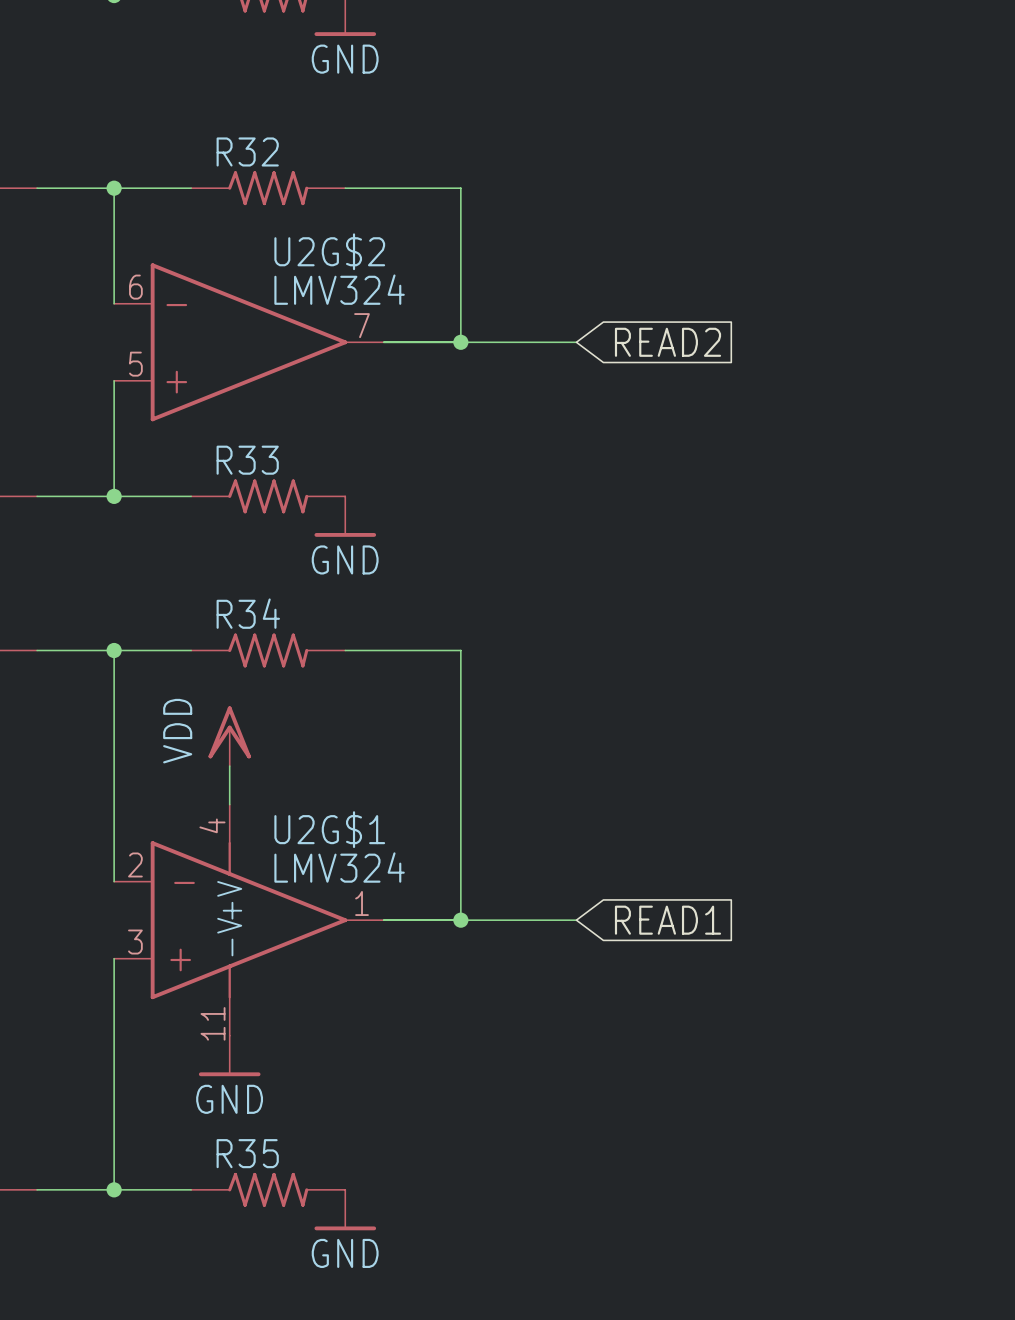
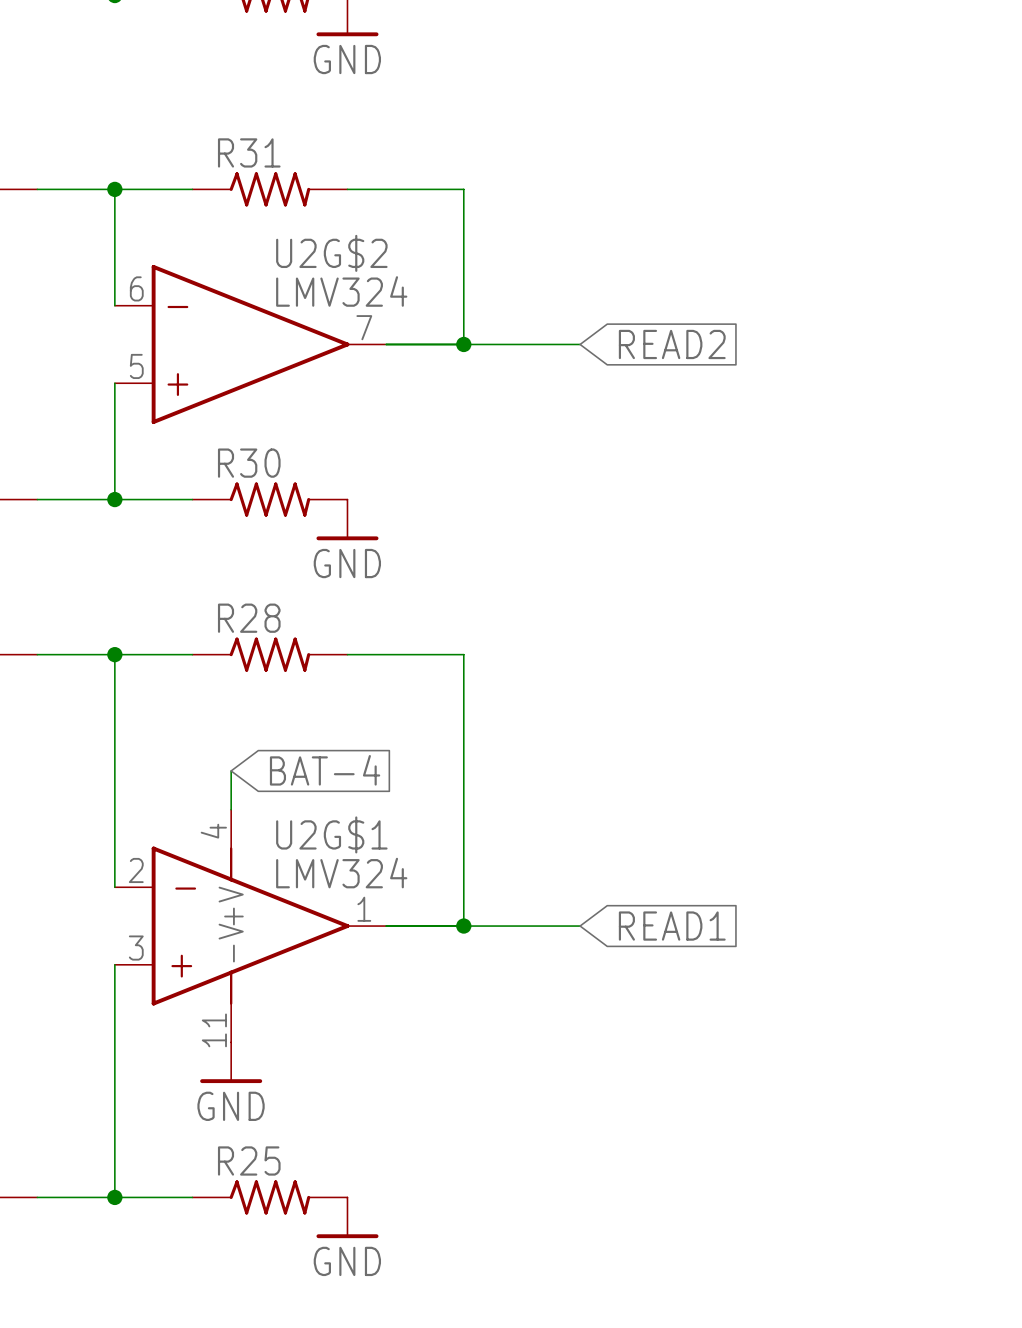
R32 name: R32 (247, 151) -> R31 (249, 152)
R33 name: R33 (247, 460) -> R30 (249, 463)
R34 name: R34 (248, 613) -> R28 (249, 618)
power symbol: VDD (229, 736) -> none
global label: none -> BAT-4 (325, 770)
R35 name: R35 (247, 1153) -> R25 (249, 1160)

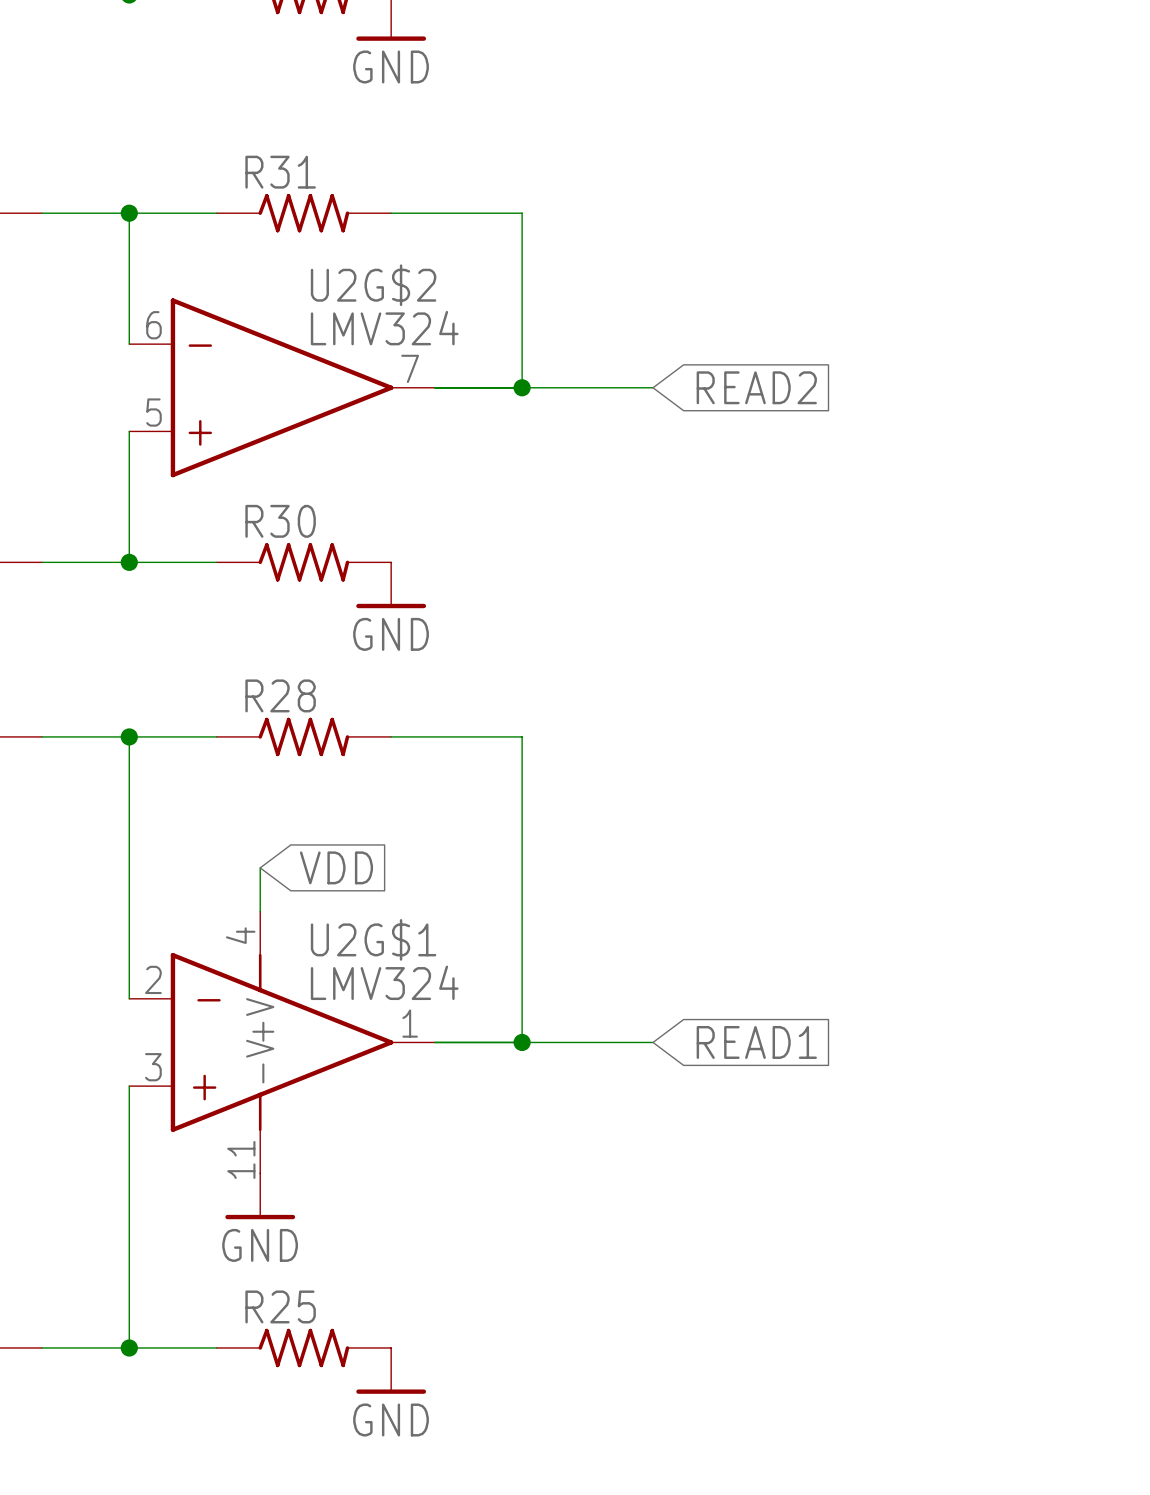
global label: BAT-4 (325, 770) -> VDD (336, 867)

